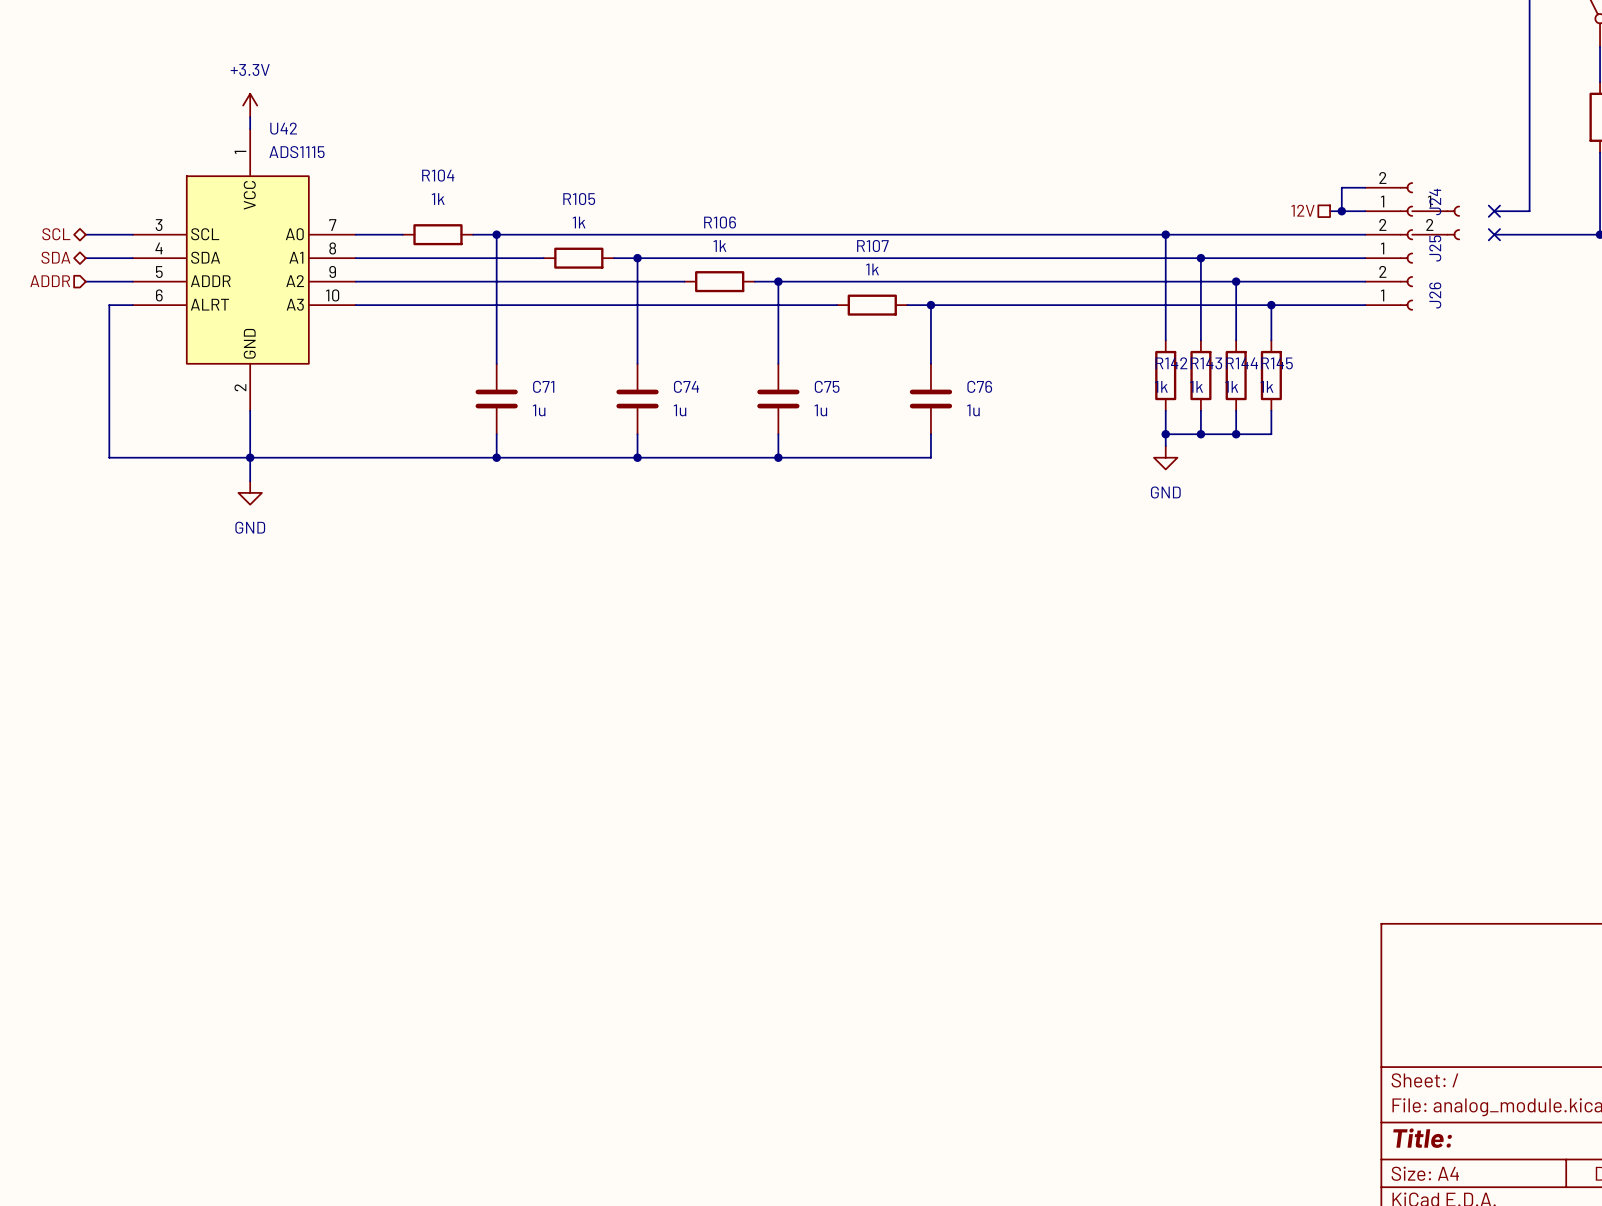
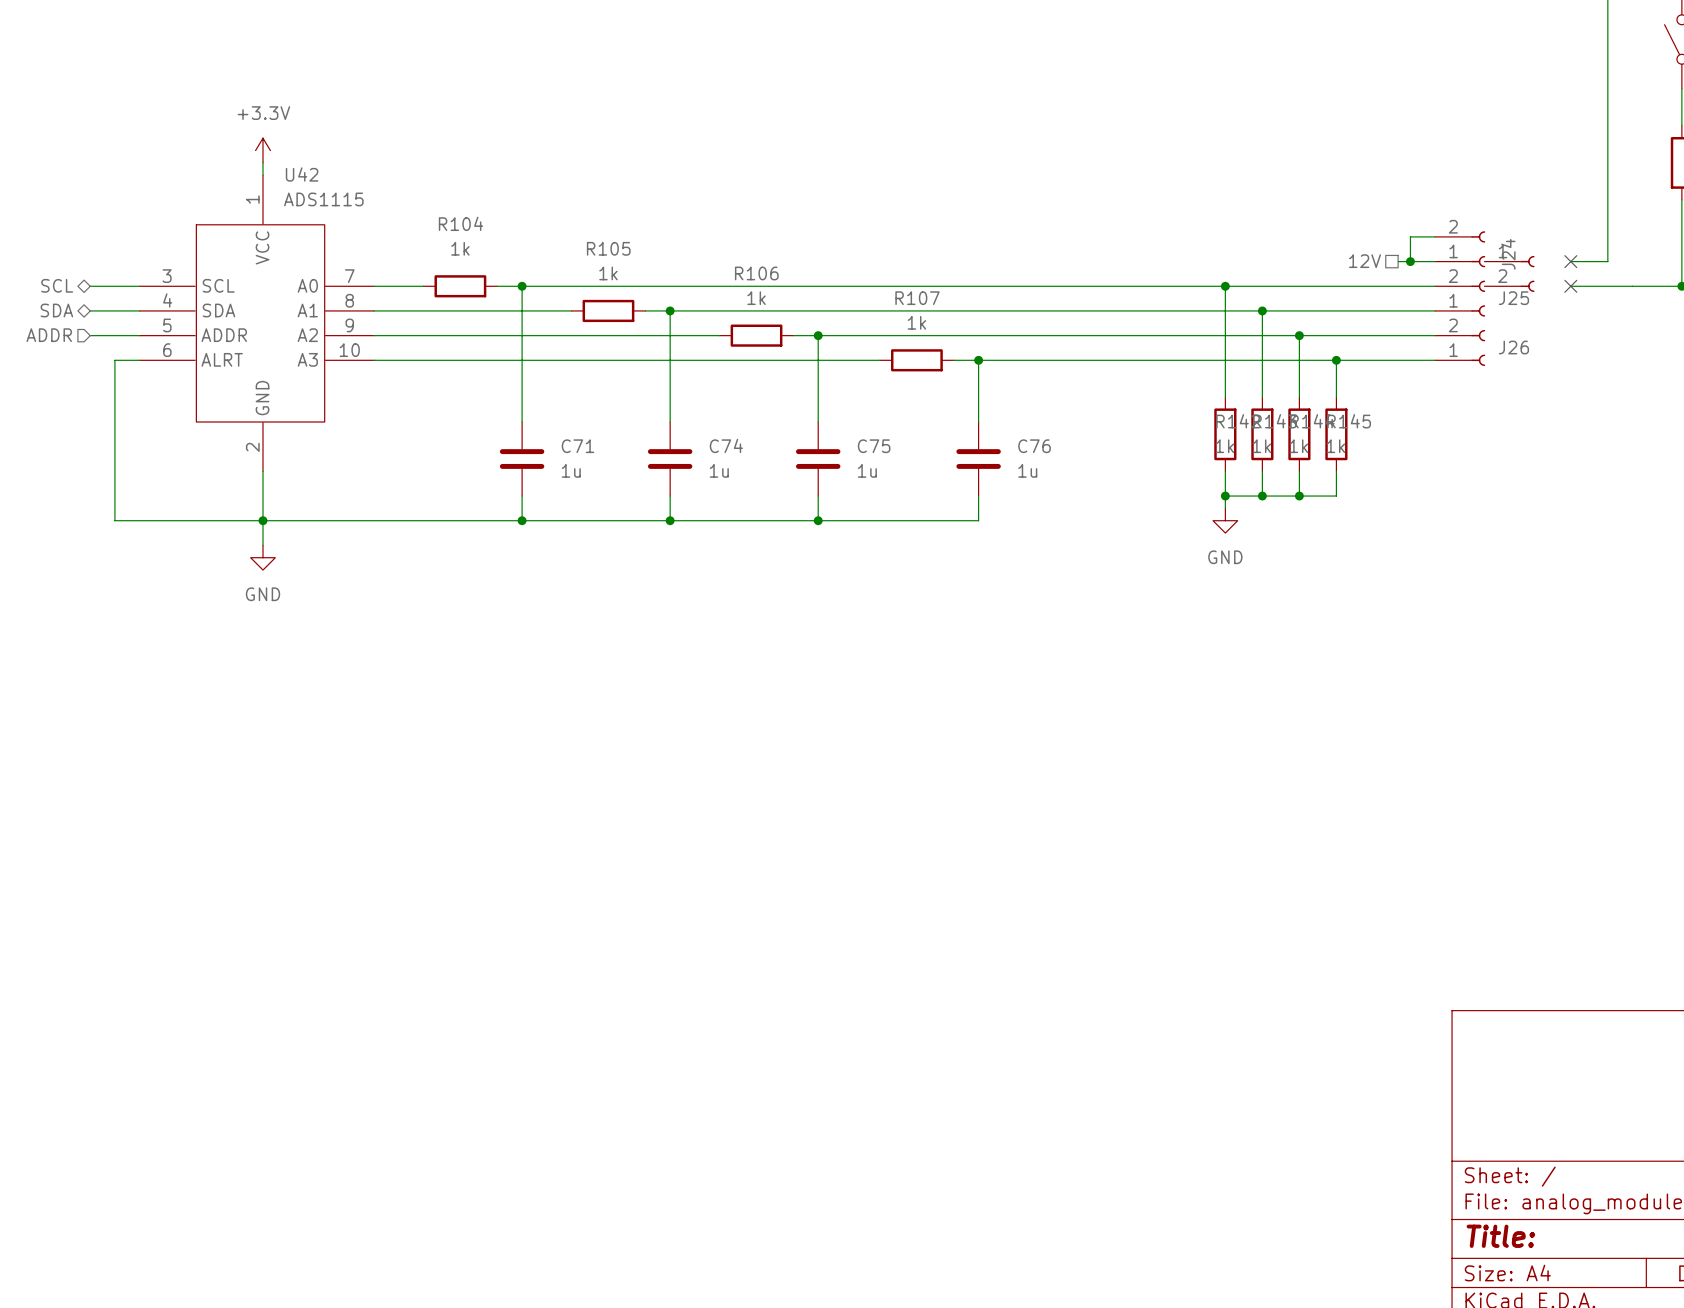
J25 name rotation: 0° (1435, 248) -> 90° clockwise (1513, 298)
J26 name rotation: 0° (1435, 295) -> 90° clockwise (1513, 347)

